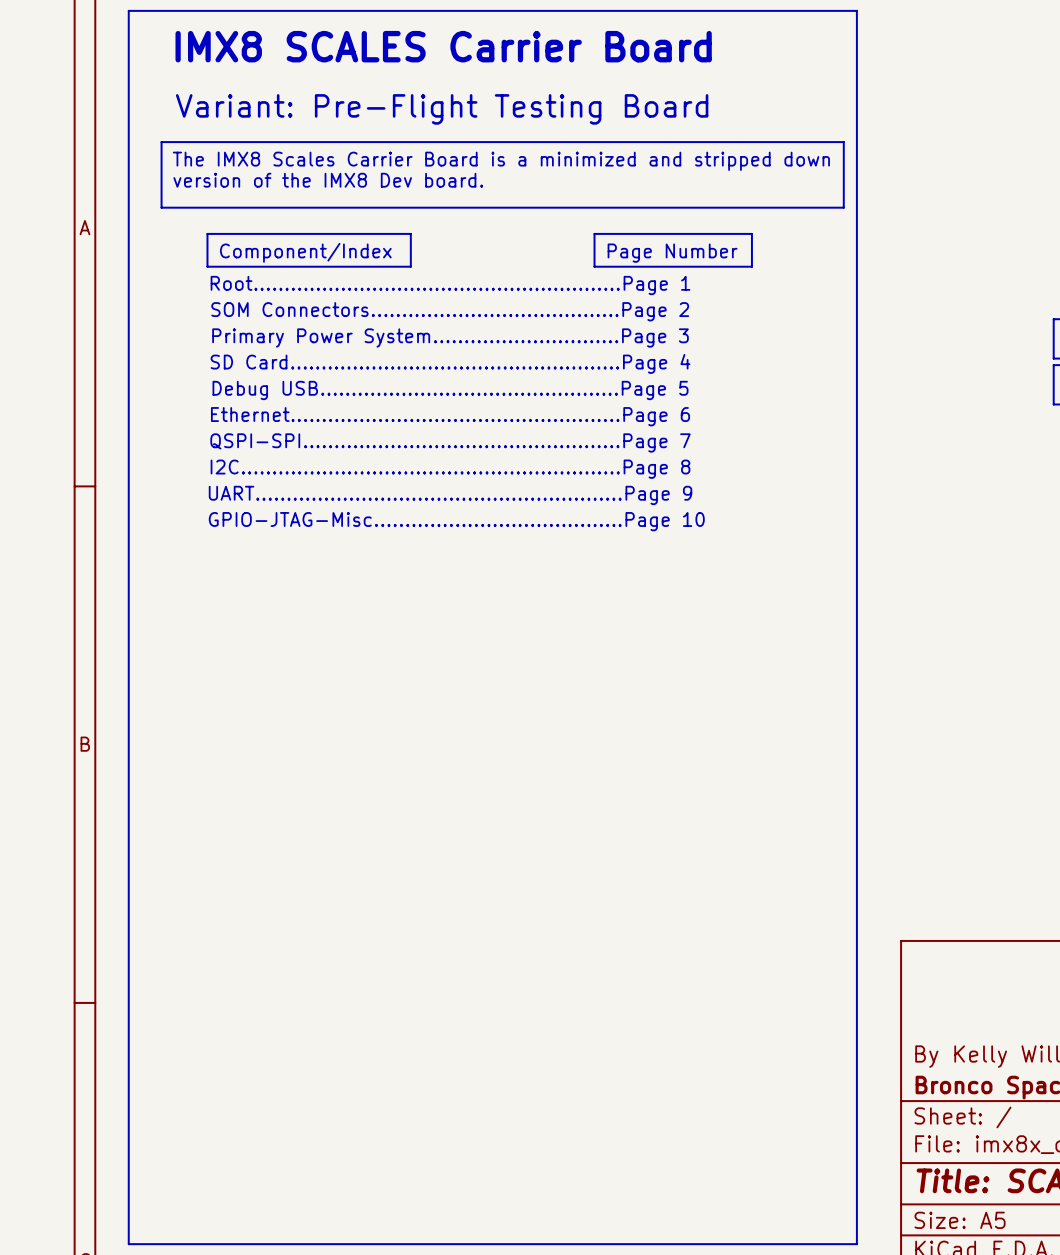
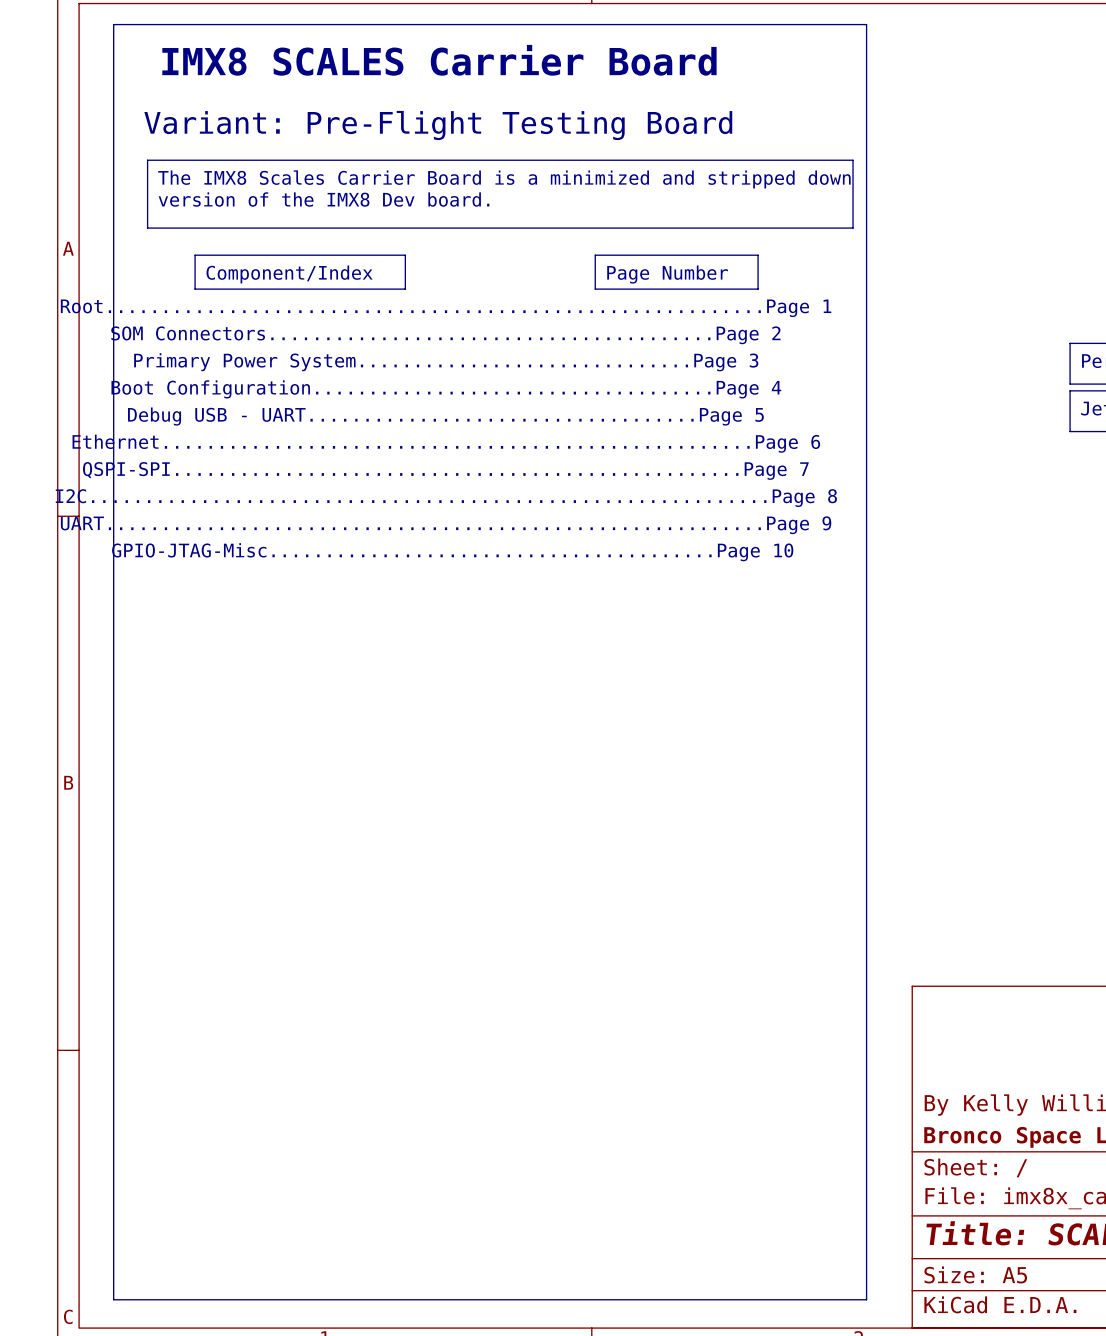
text: SD Card.....................................................Page 4 (450, 363) -> Boot Configuration....................................Page 4 (446, 389)
text: Debug USB................................................Page 5 (450, 390) -> Debug USB - UART...................................Page 5 (445, 416)

